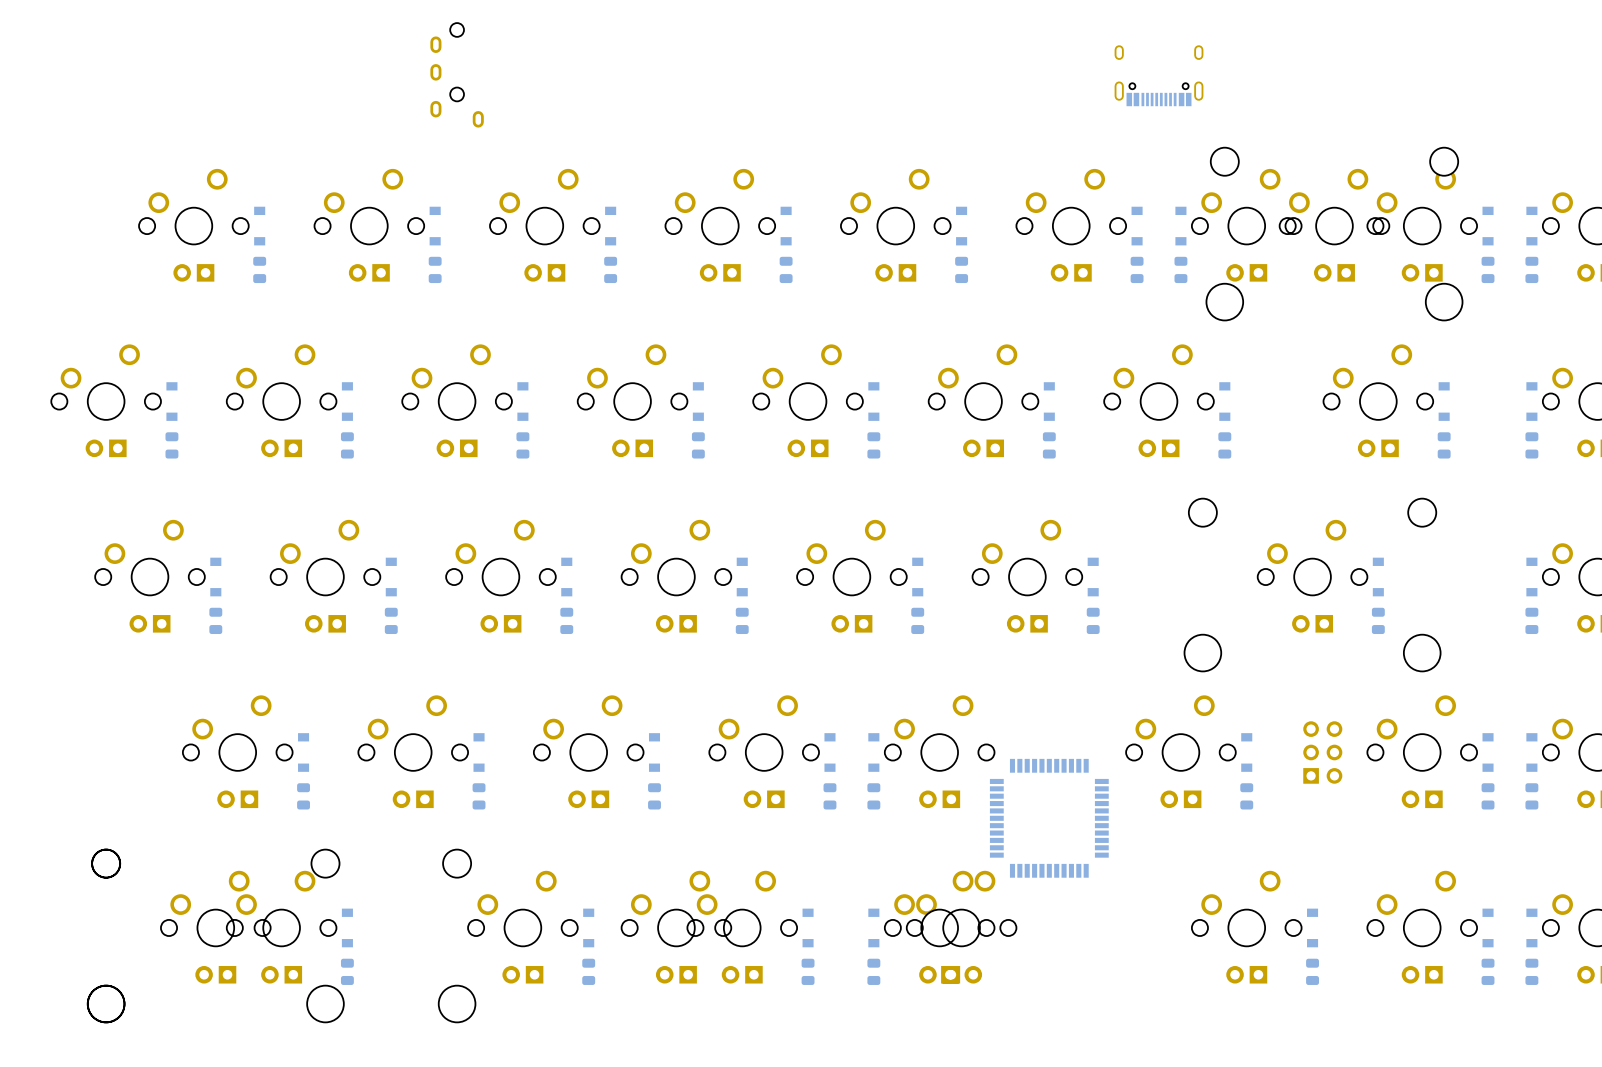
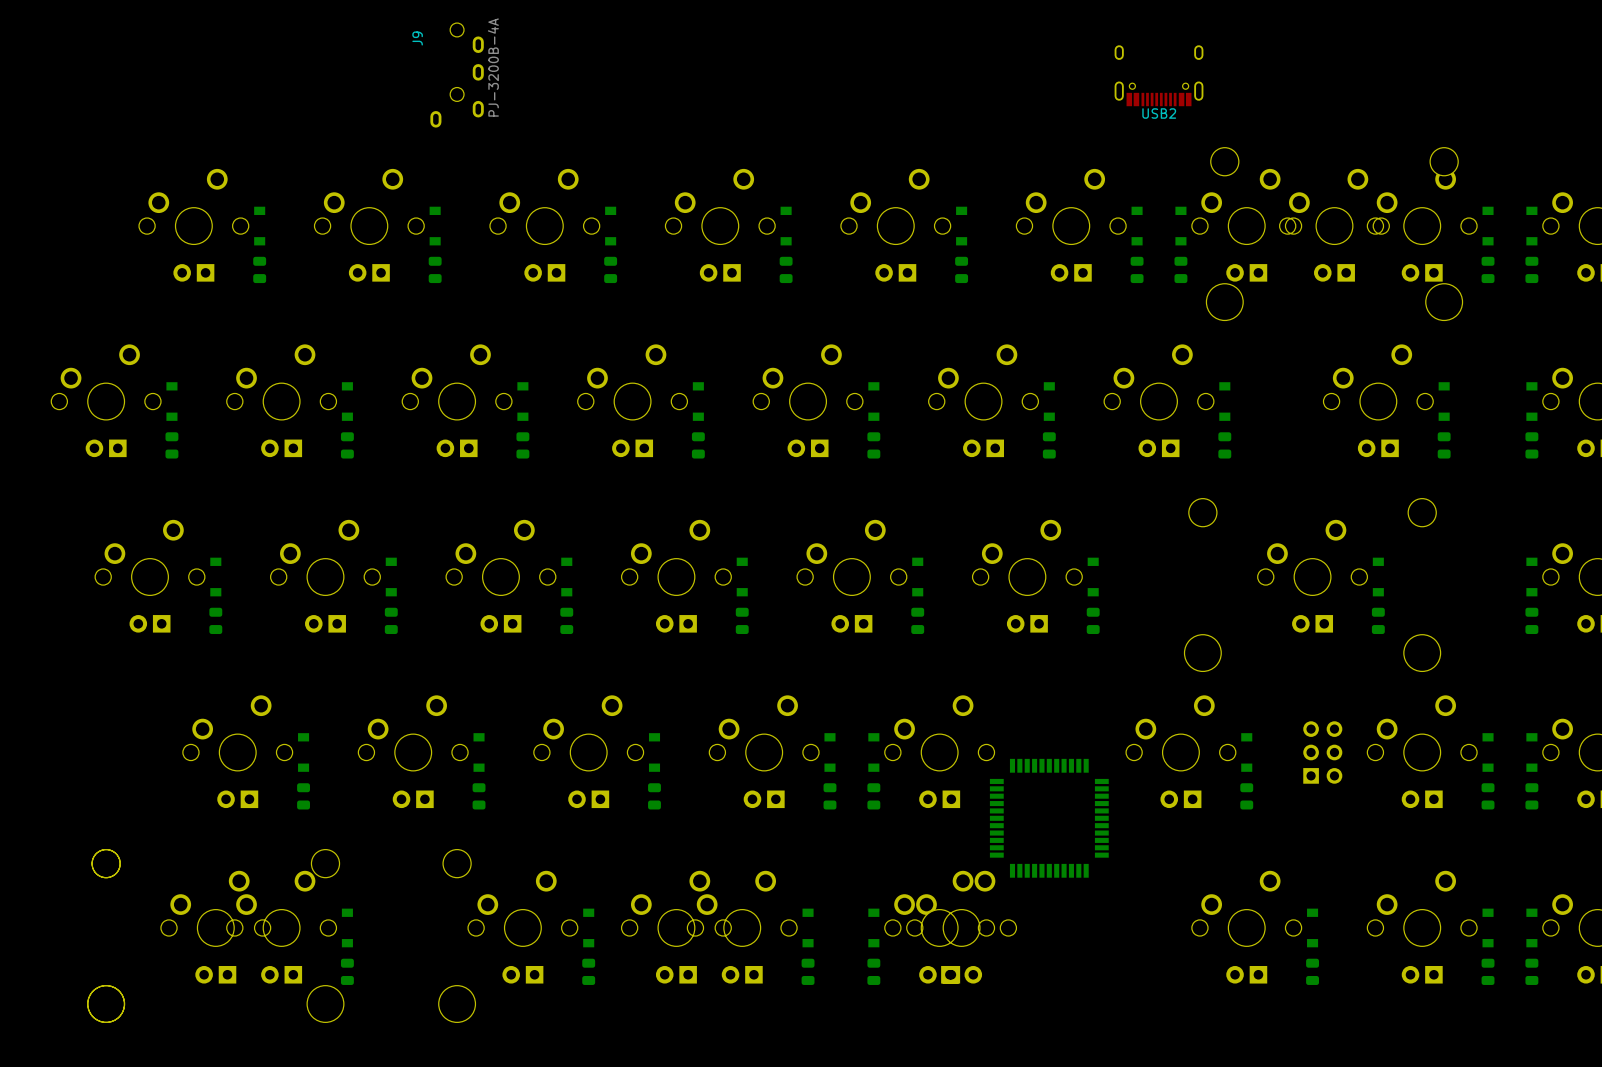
J9 side: bottom (457, 75) -> top (457, 75)
USB2 side: bottom (1159, 75) -> top (1159, 75)

